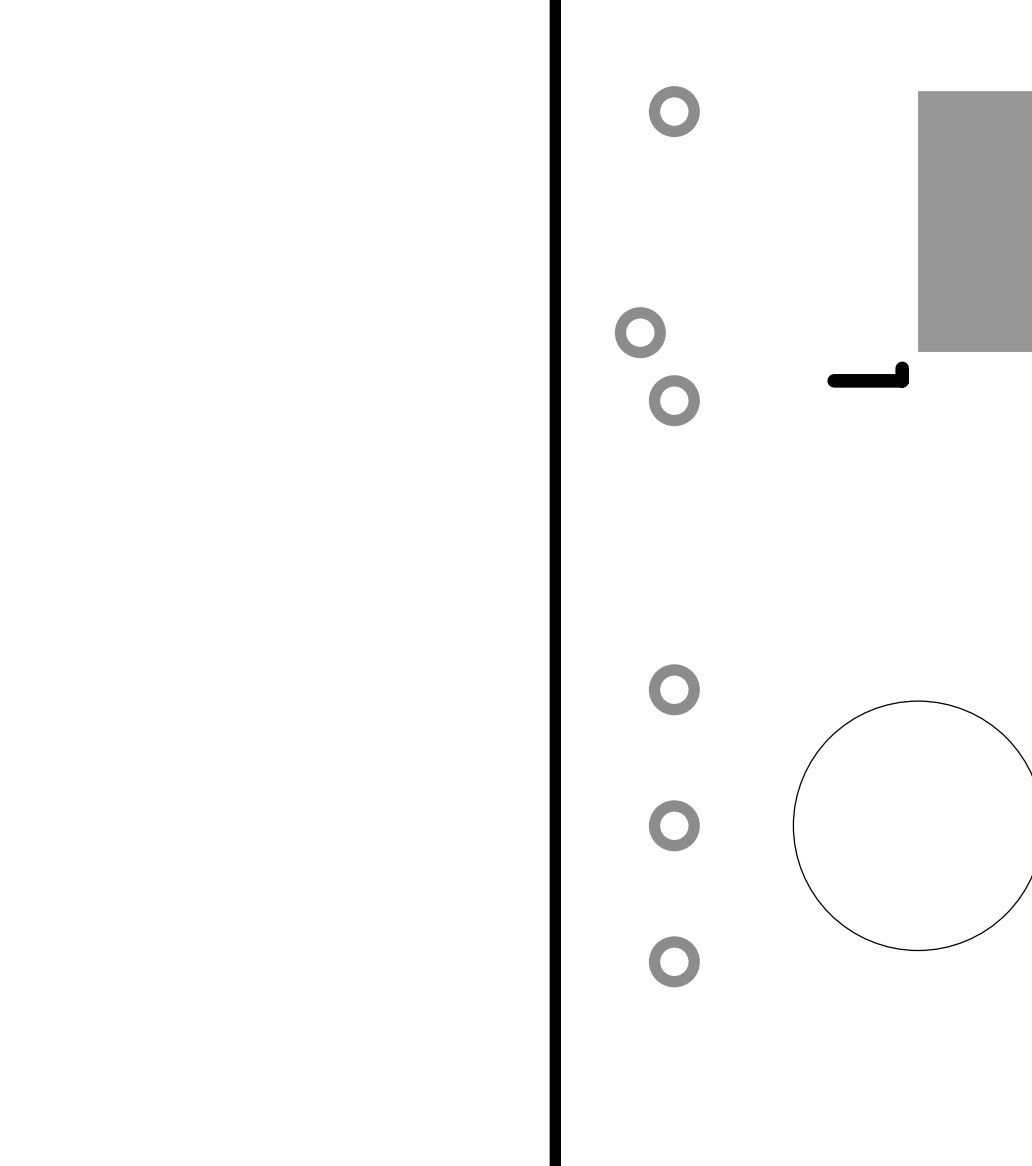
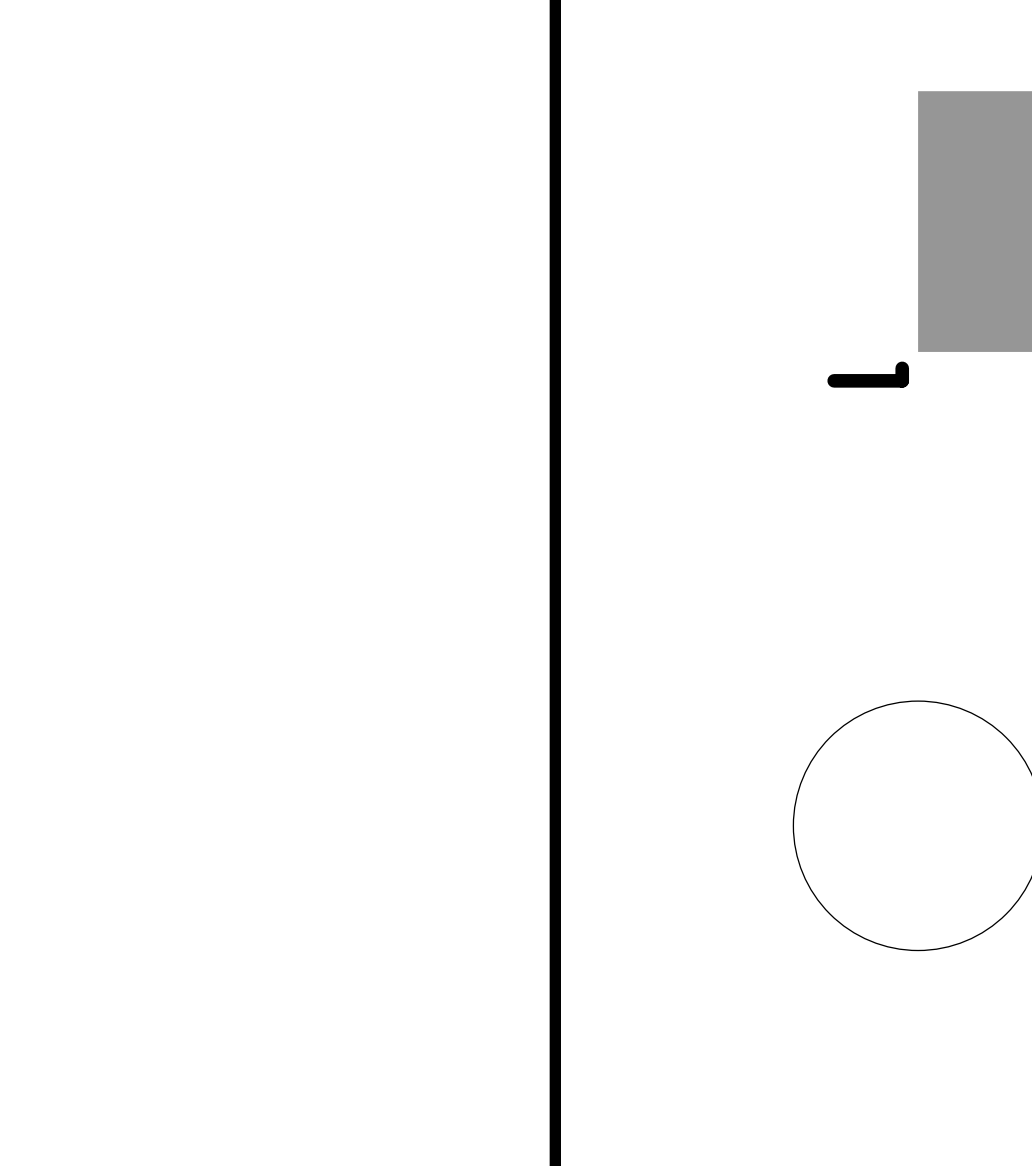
via: (674, 111) -> none
via: (640, 332) -> none
via: (674, 400) -> none
via: (674, 689) -> none
via: (674, 825) -> none
via: (674, 961) -> none

